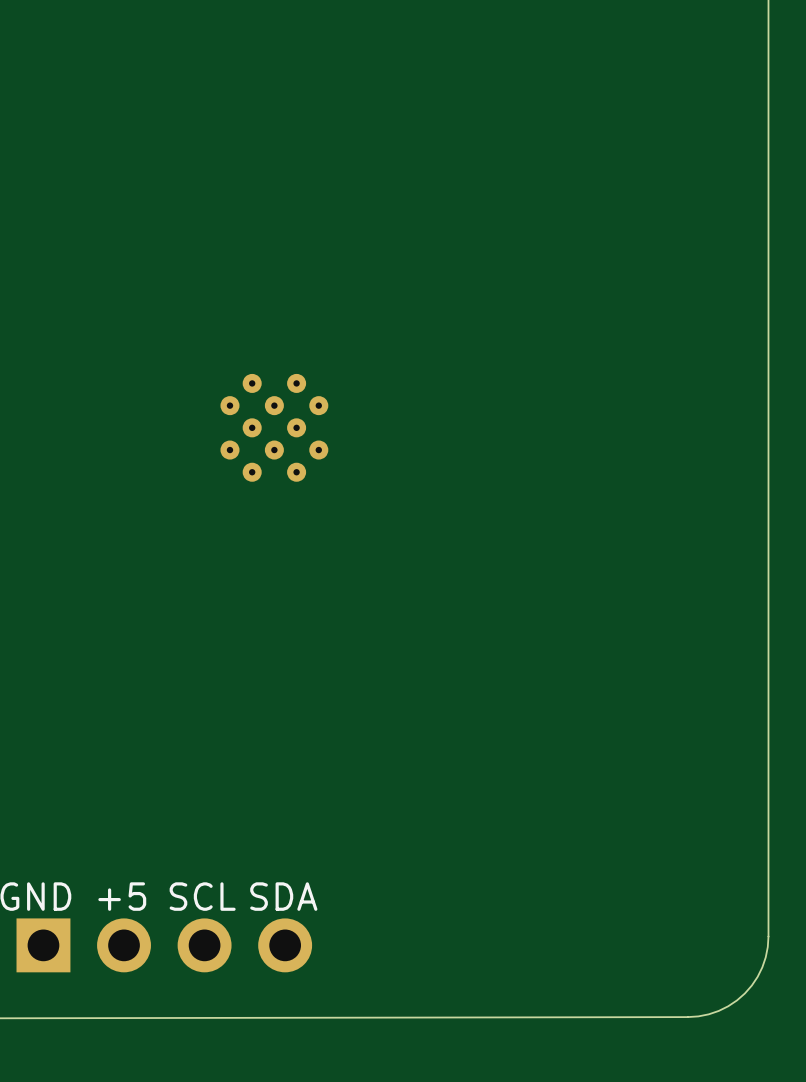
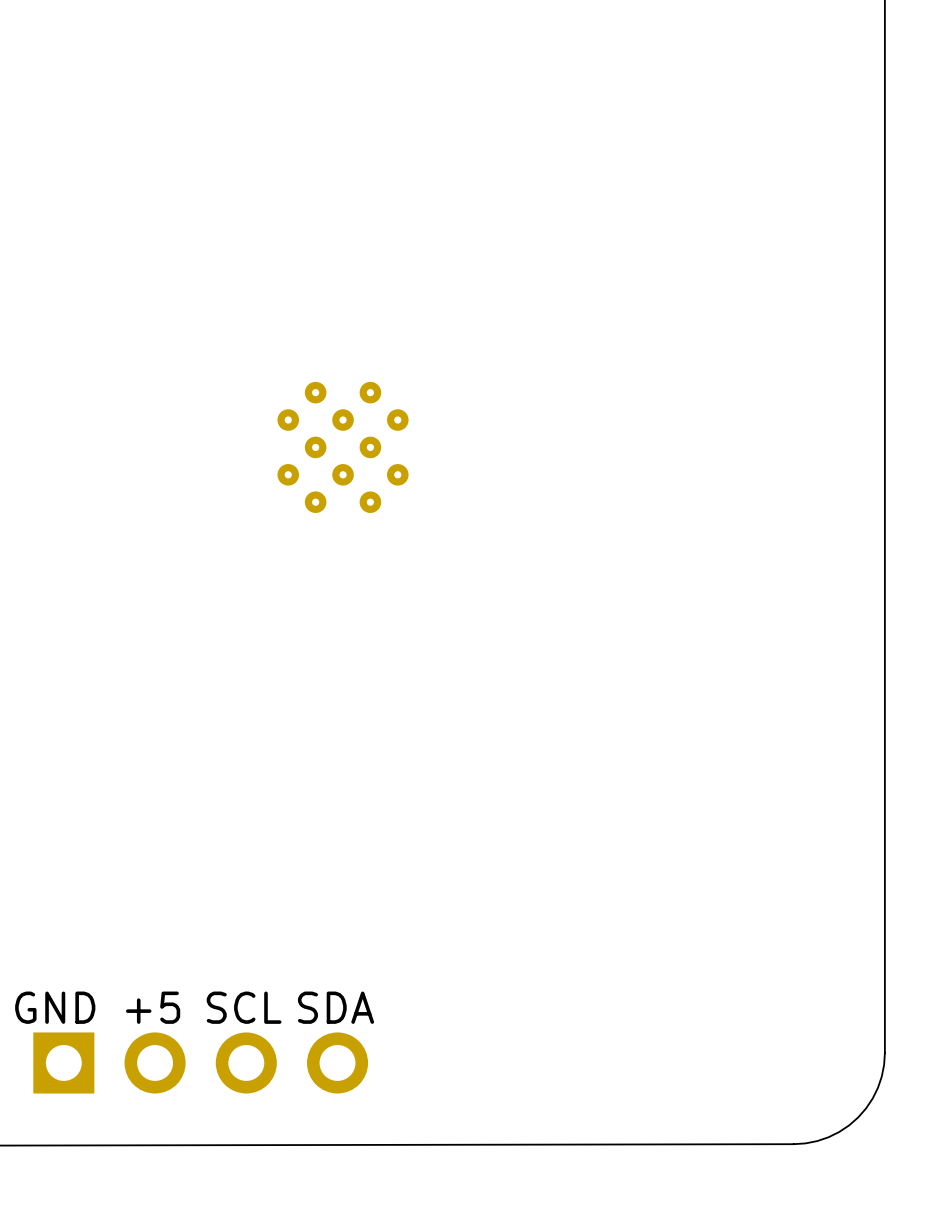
part footprint: [220, 373, 329, 482] -> [277, 381, 409, 513]

